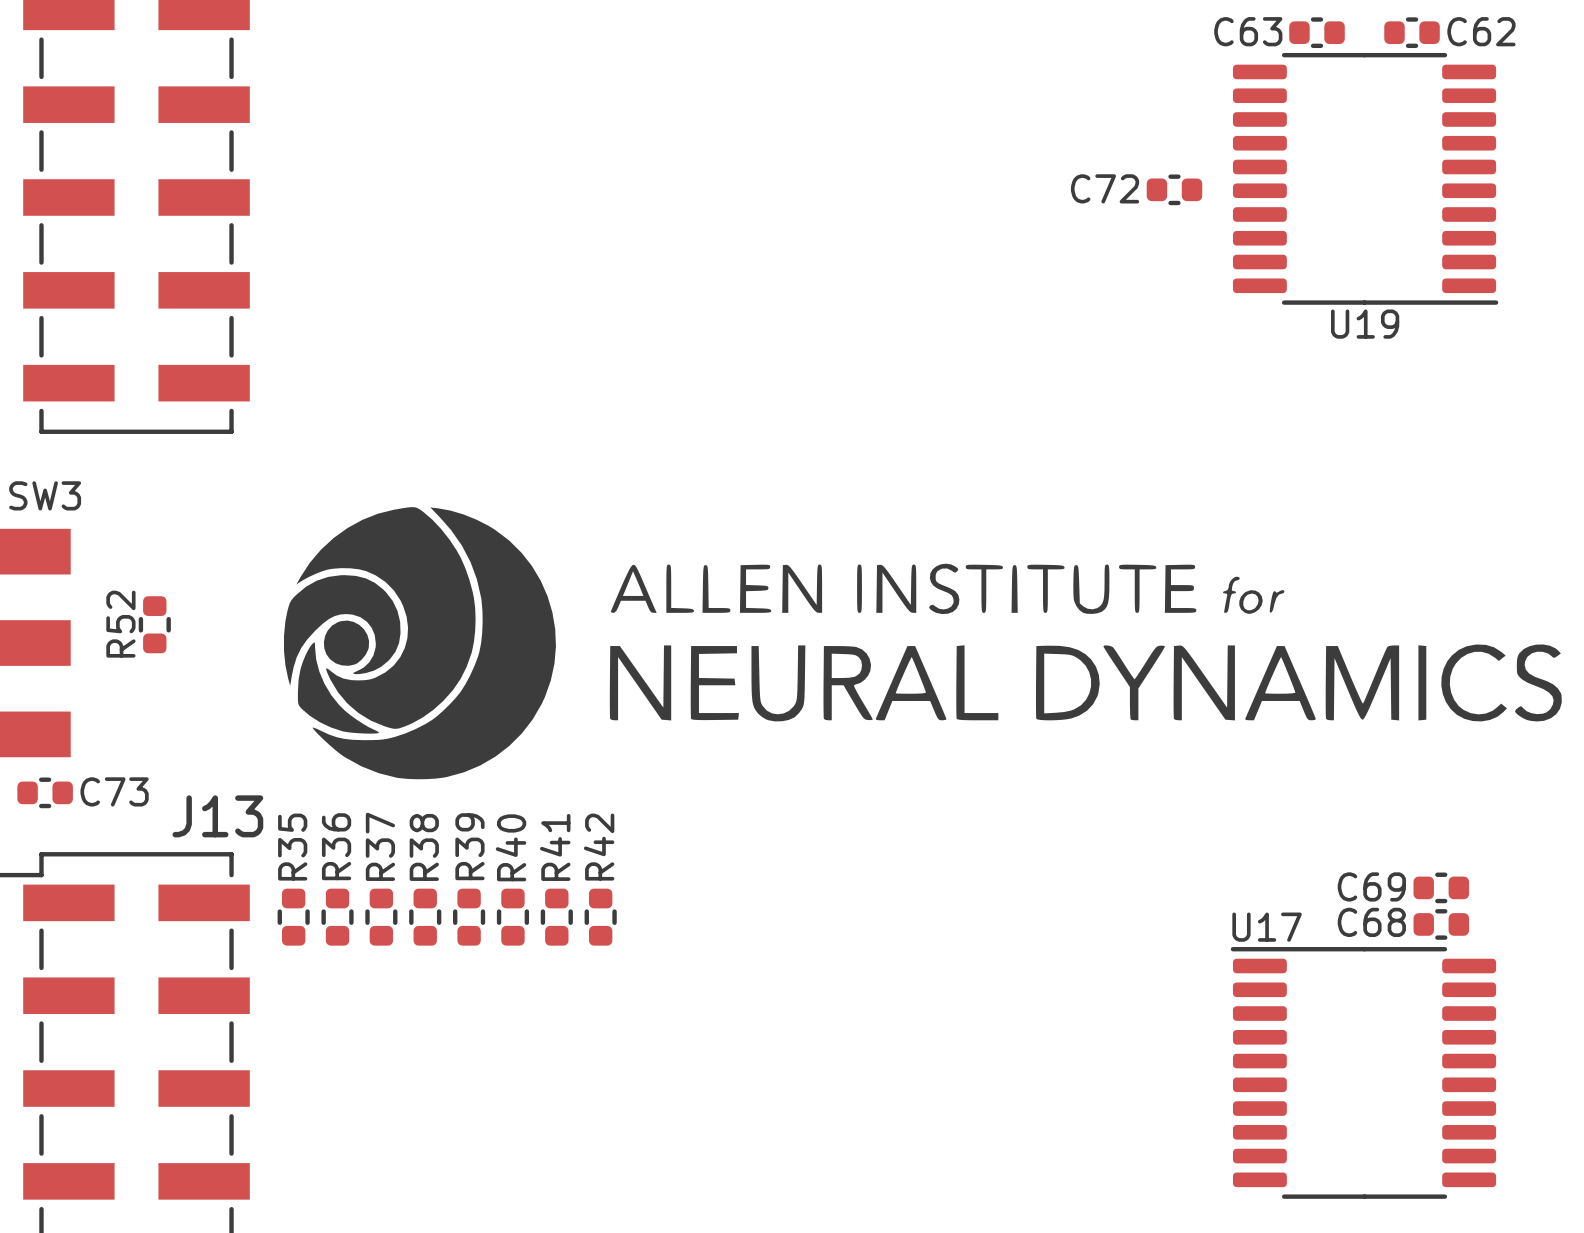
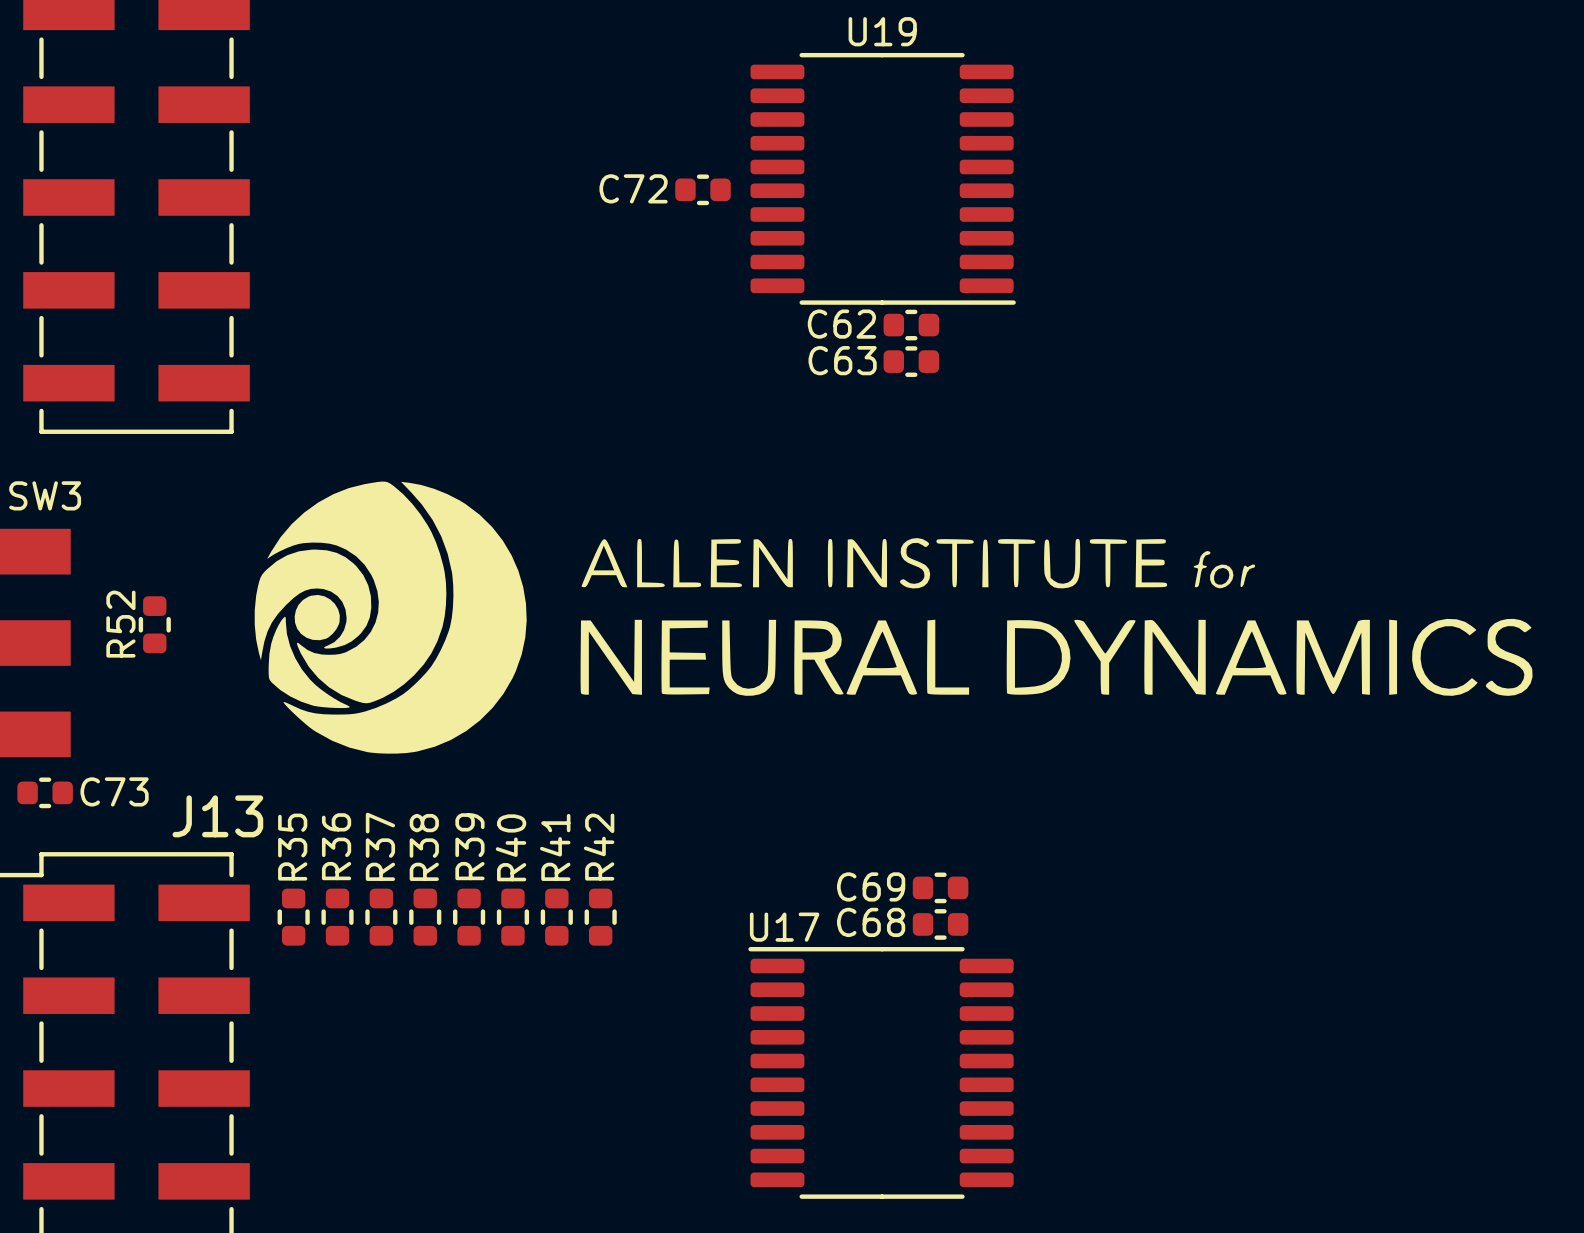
C62 name position: C62 (1481, 31) -> C62 (841, 324)
C63 position: (1317, 32) -> (911, 361)
C62 position: (1412, 32) -> (911, 325)
U19 position: (1365, 178) -> (883, 178)
C72 position: (1174, 189) -> (703, 189)
U19 name position: U19 (1365, 324) -> U19 (882, 31)
drawing position: (922, 643) -> (893, 617)
C69 position: (1441, 887) -> (940, 887)
C68 position: (1441, 924) -> (940, 924)
U17 position: (1363, 1072) -> (880, 1072)

